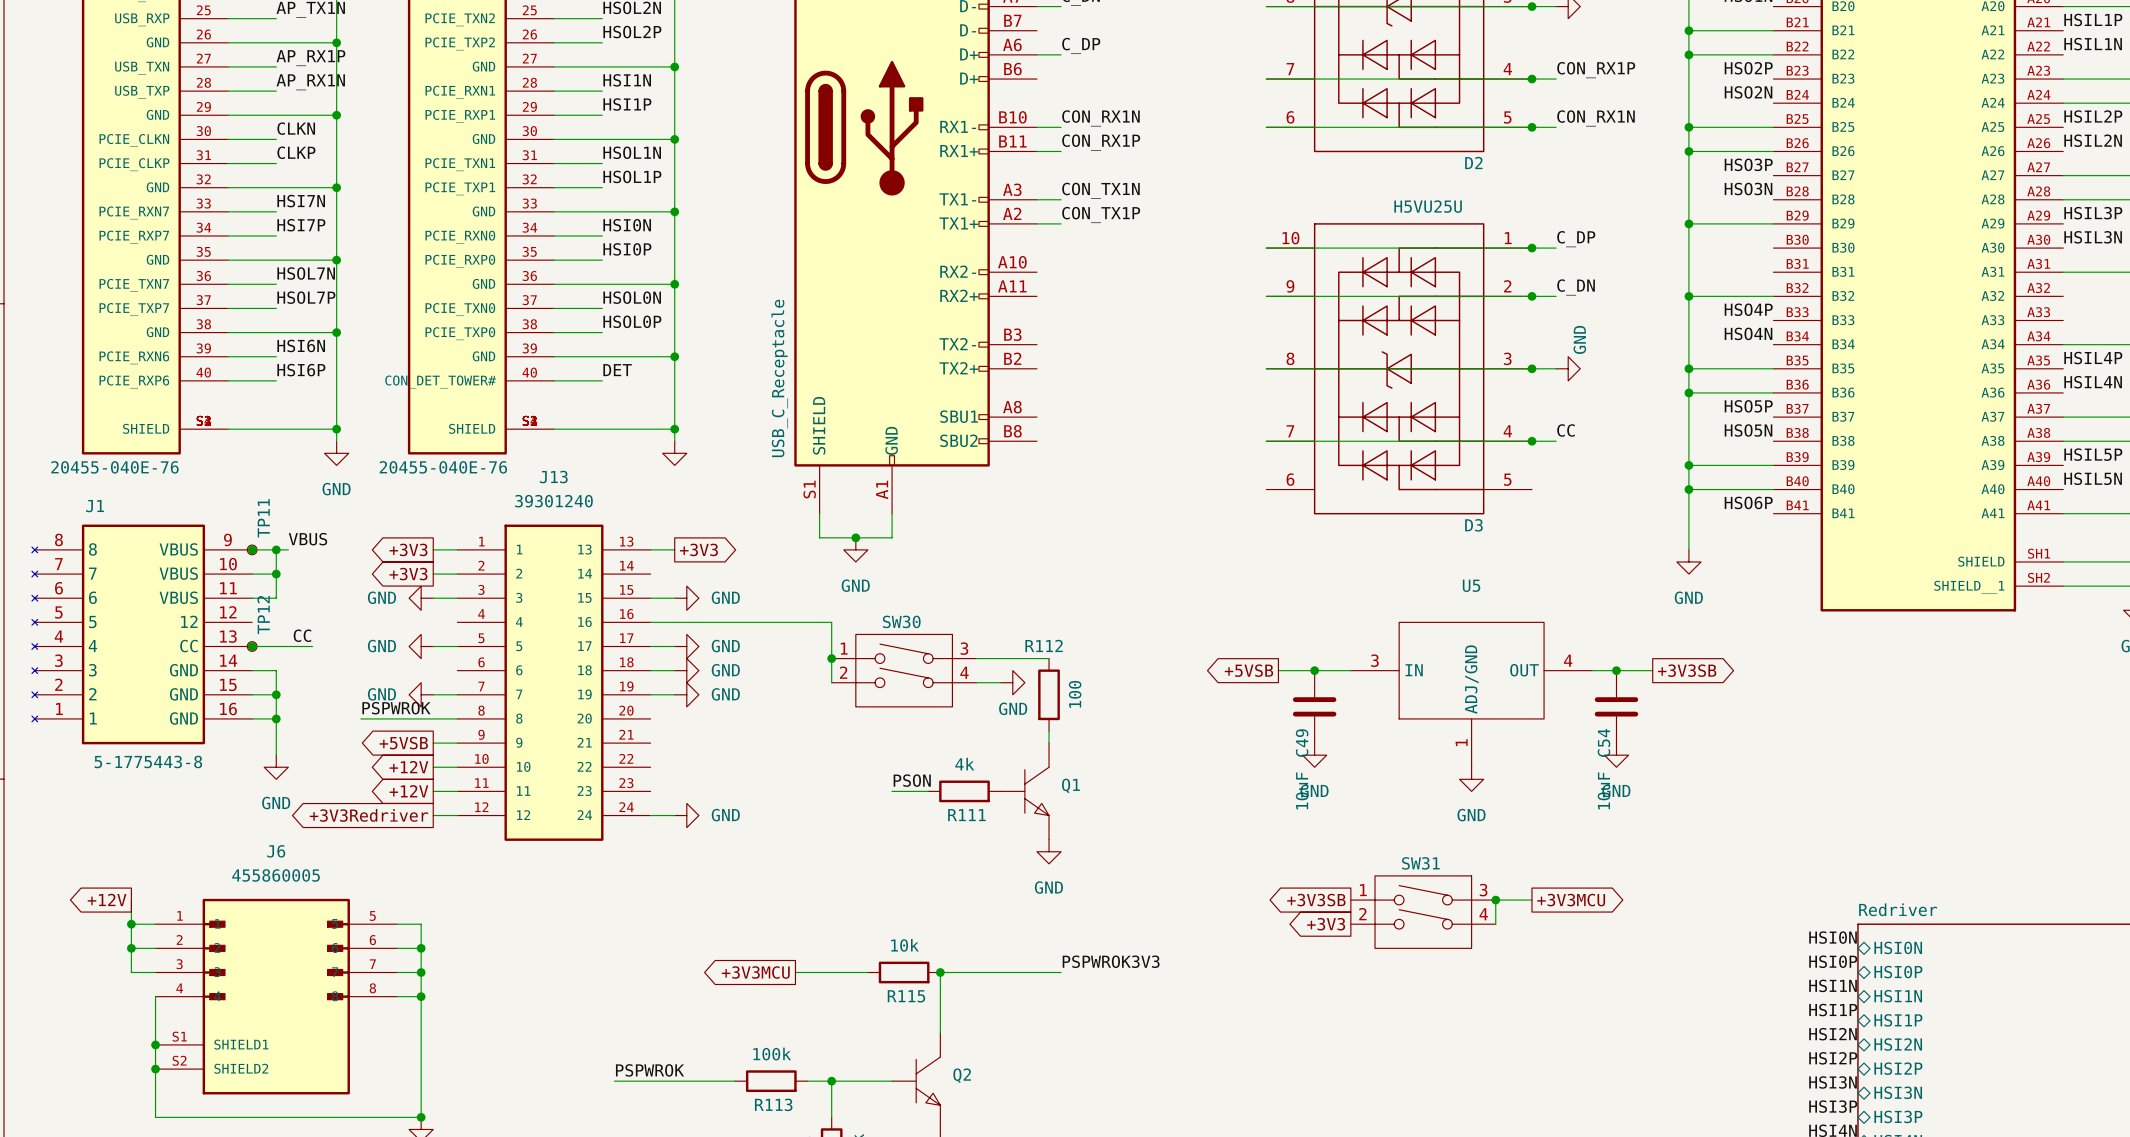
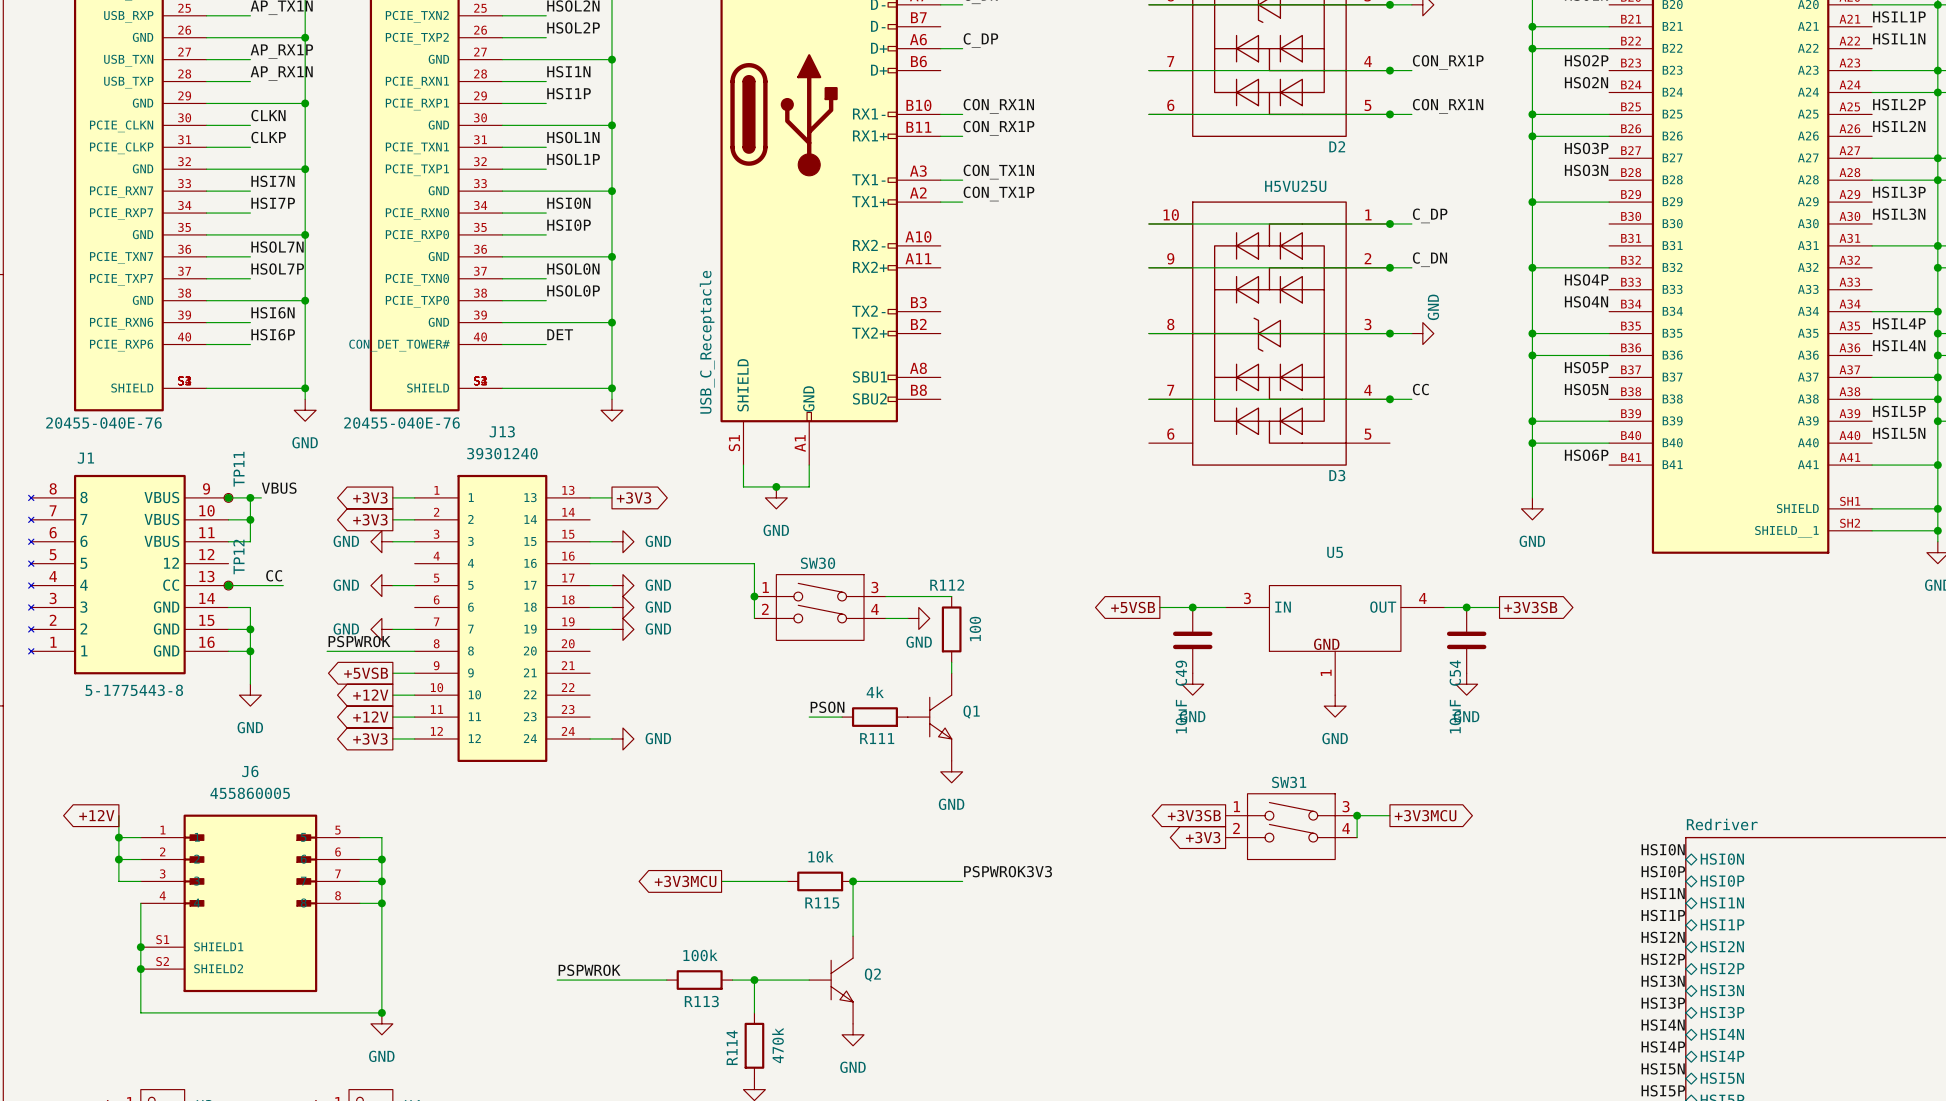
U5 symbol: [1350, 622, 1593, 768] -> [1225, 585, 1445, 696]
global label: +3V3Redriver (368, 815) -> +3V3 (370, 738)

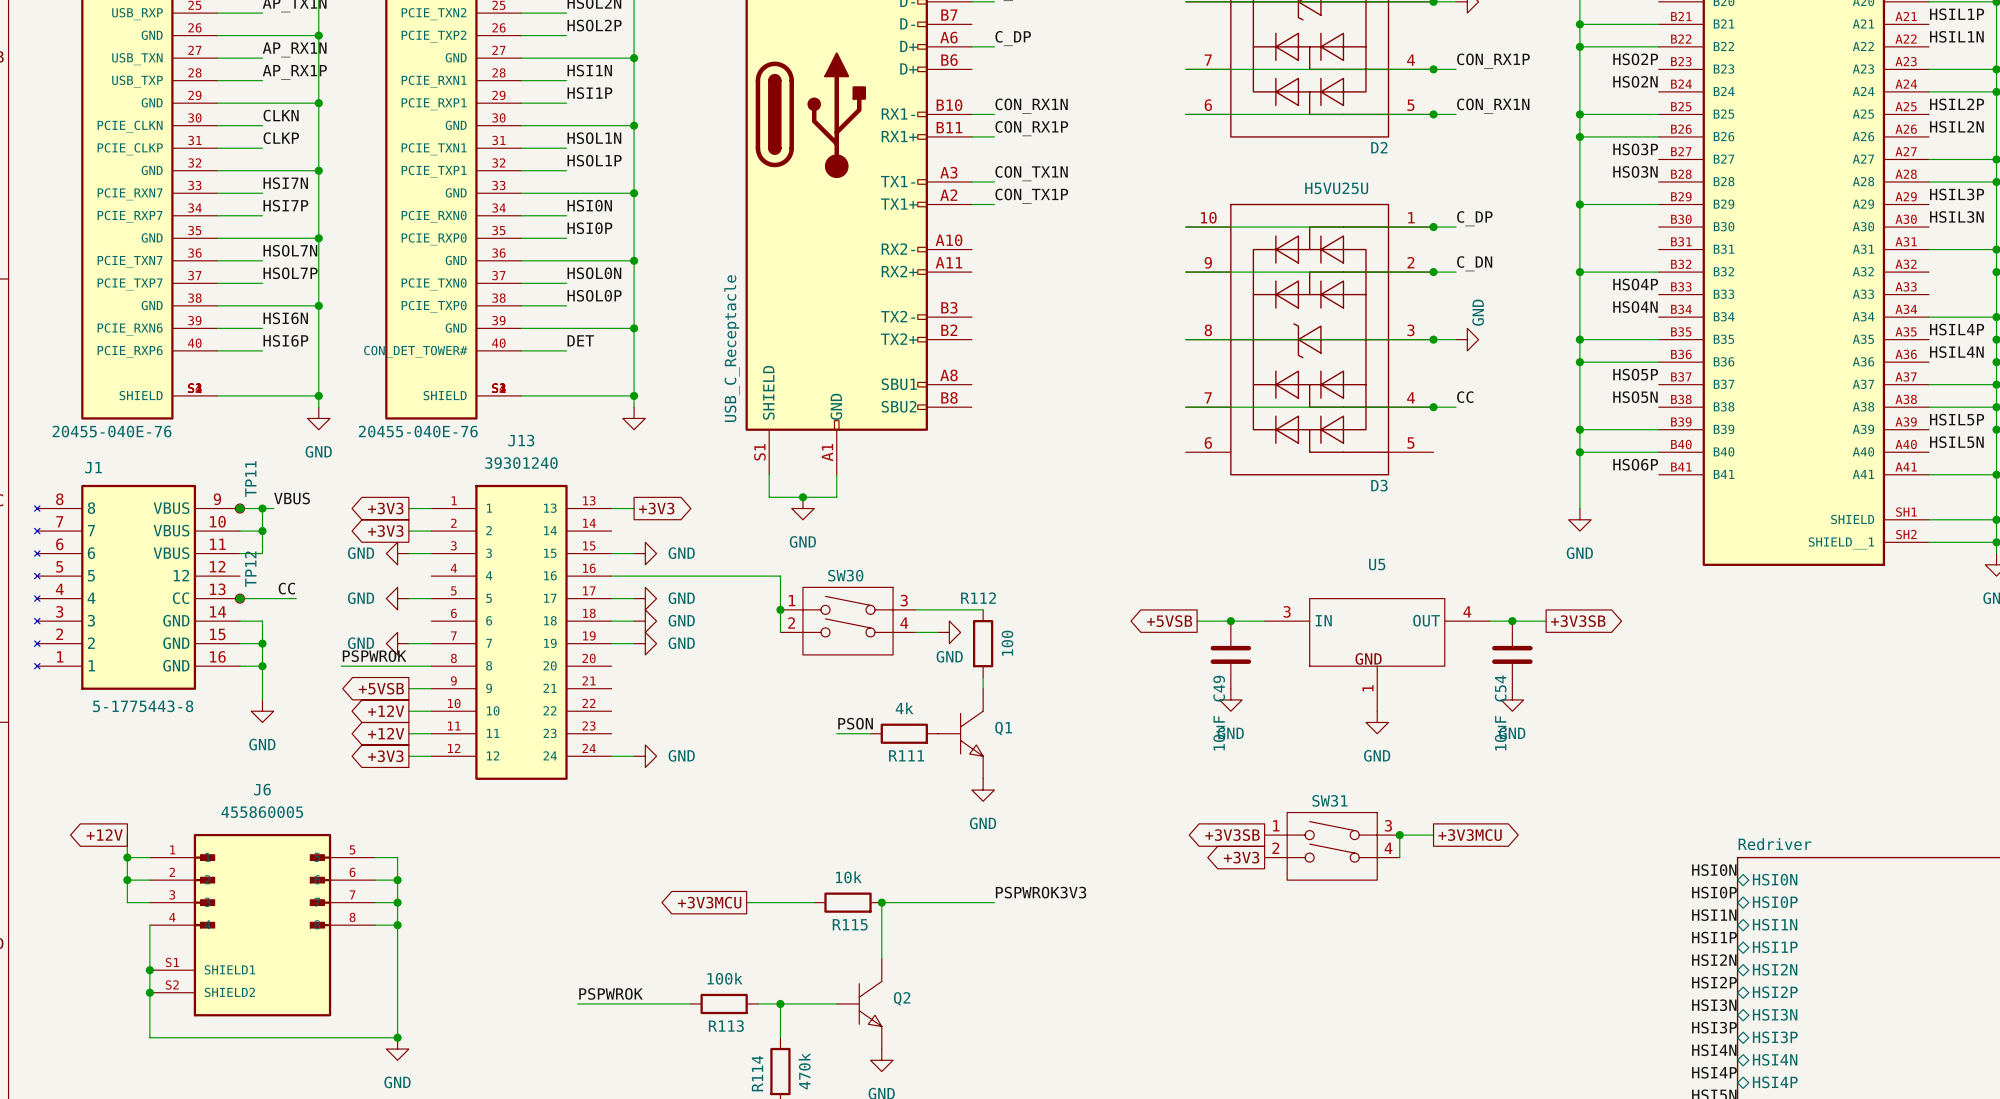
label: AP_RX1P (281, 51) -> AP_RX1N (294, 49)
label: AP_RX1N (281, 73) -> AP_RX1P (294, 72)

